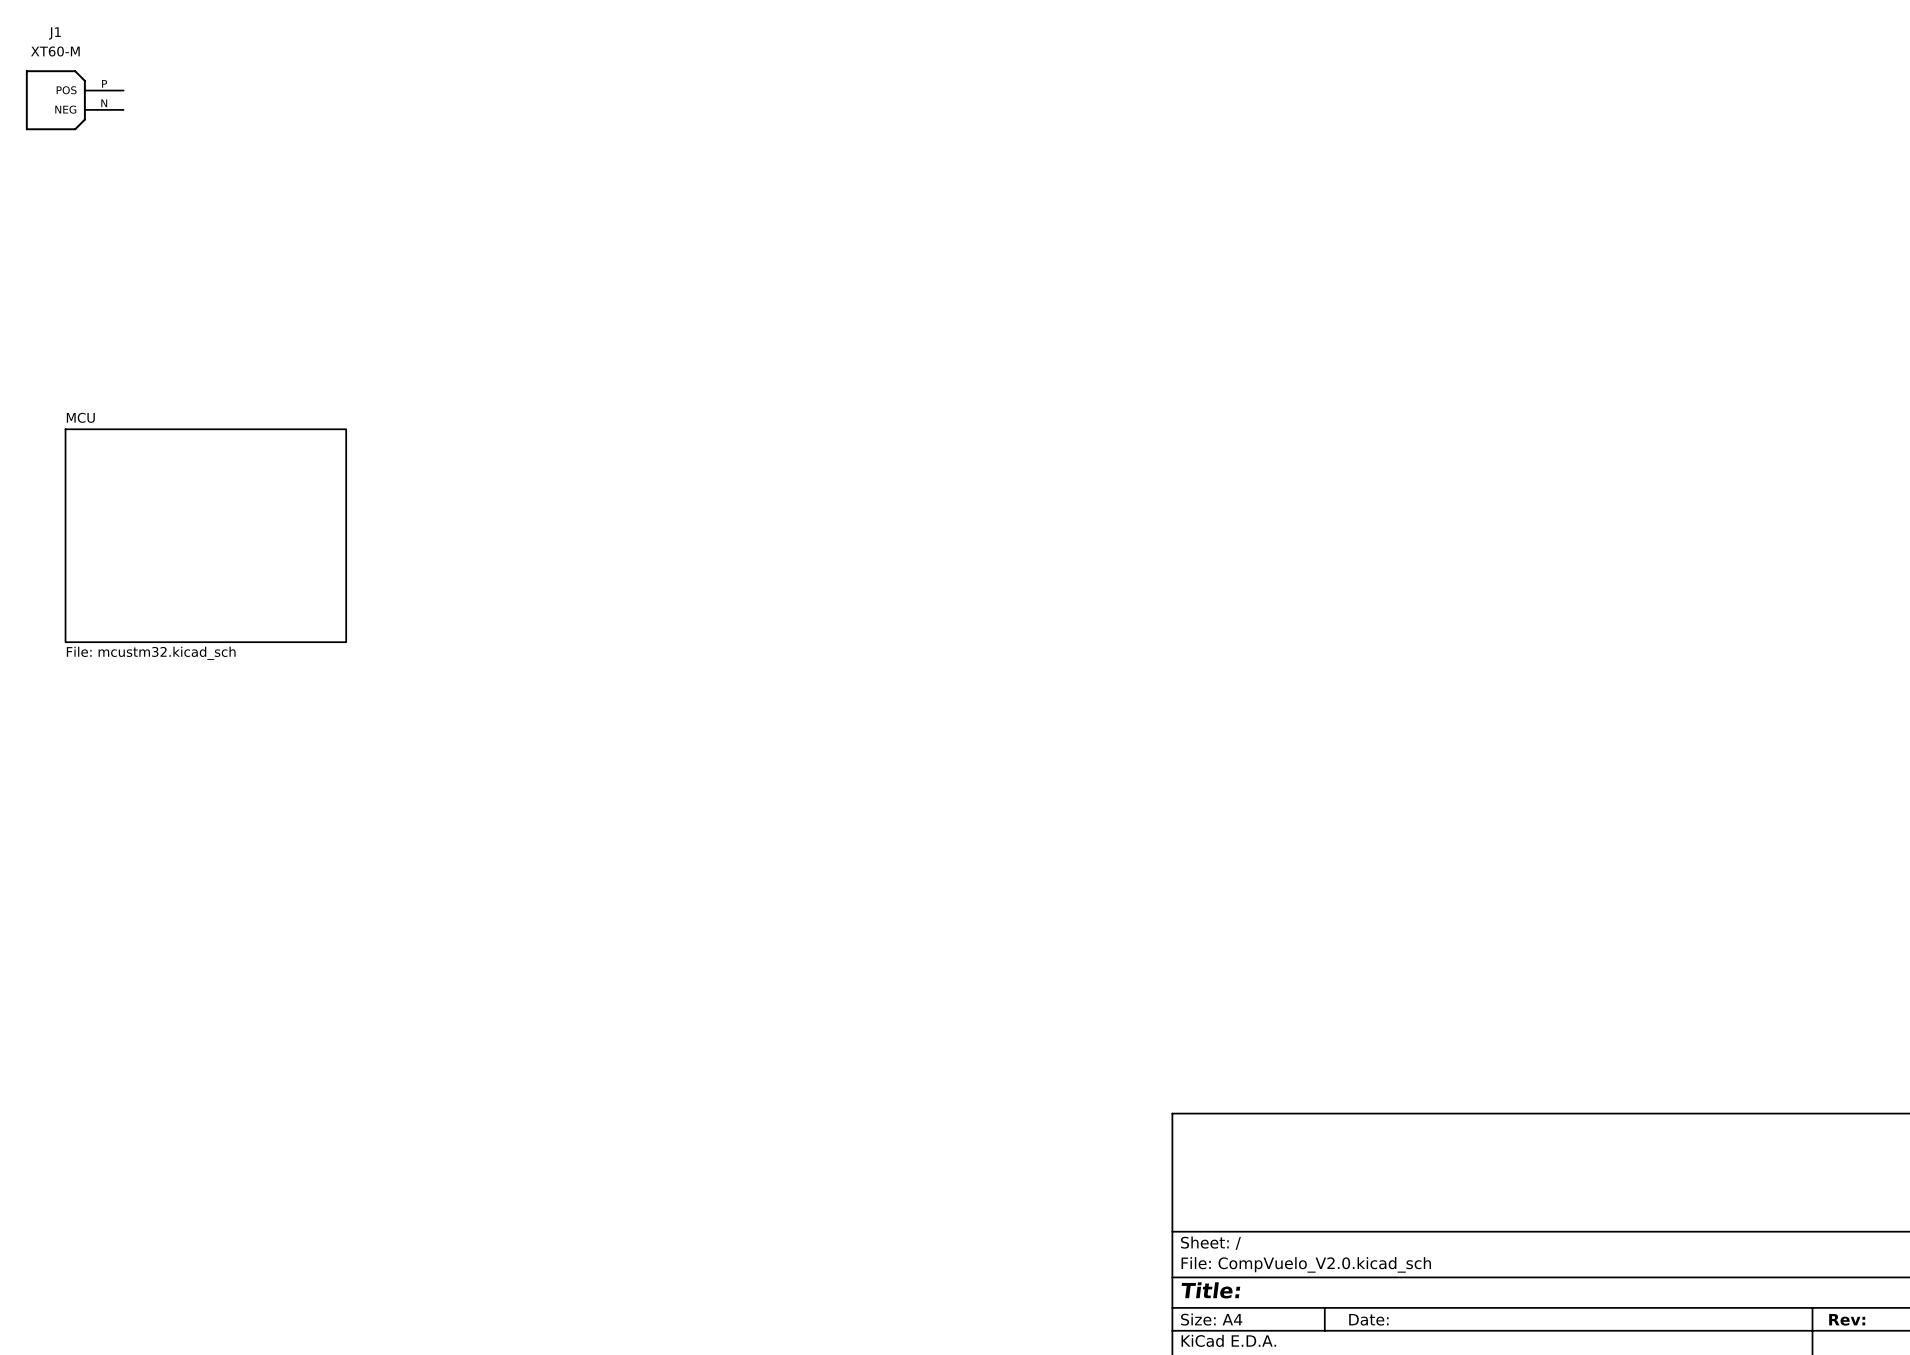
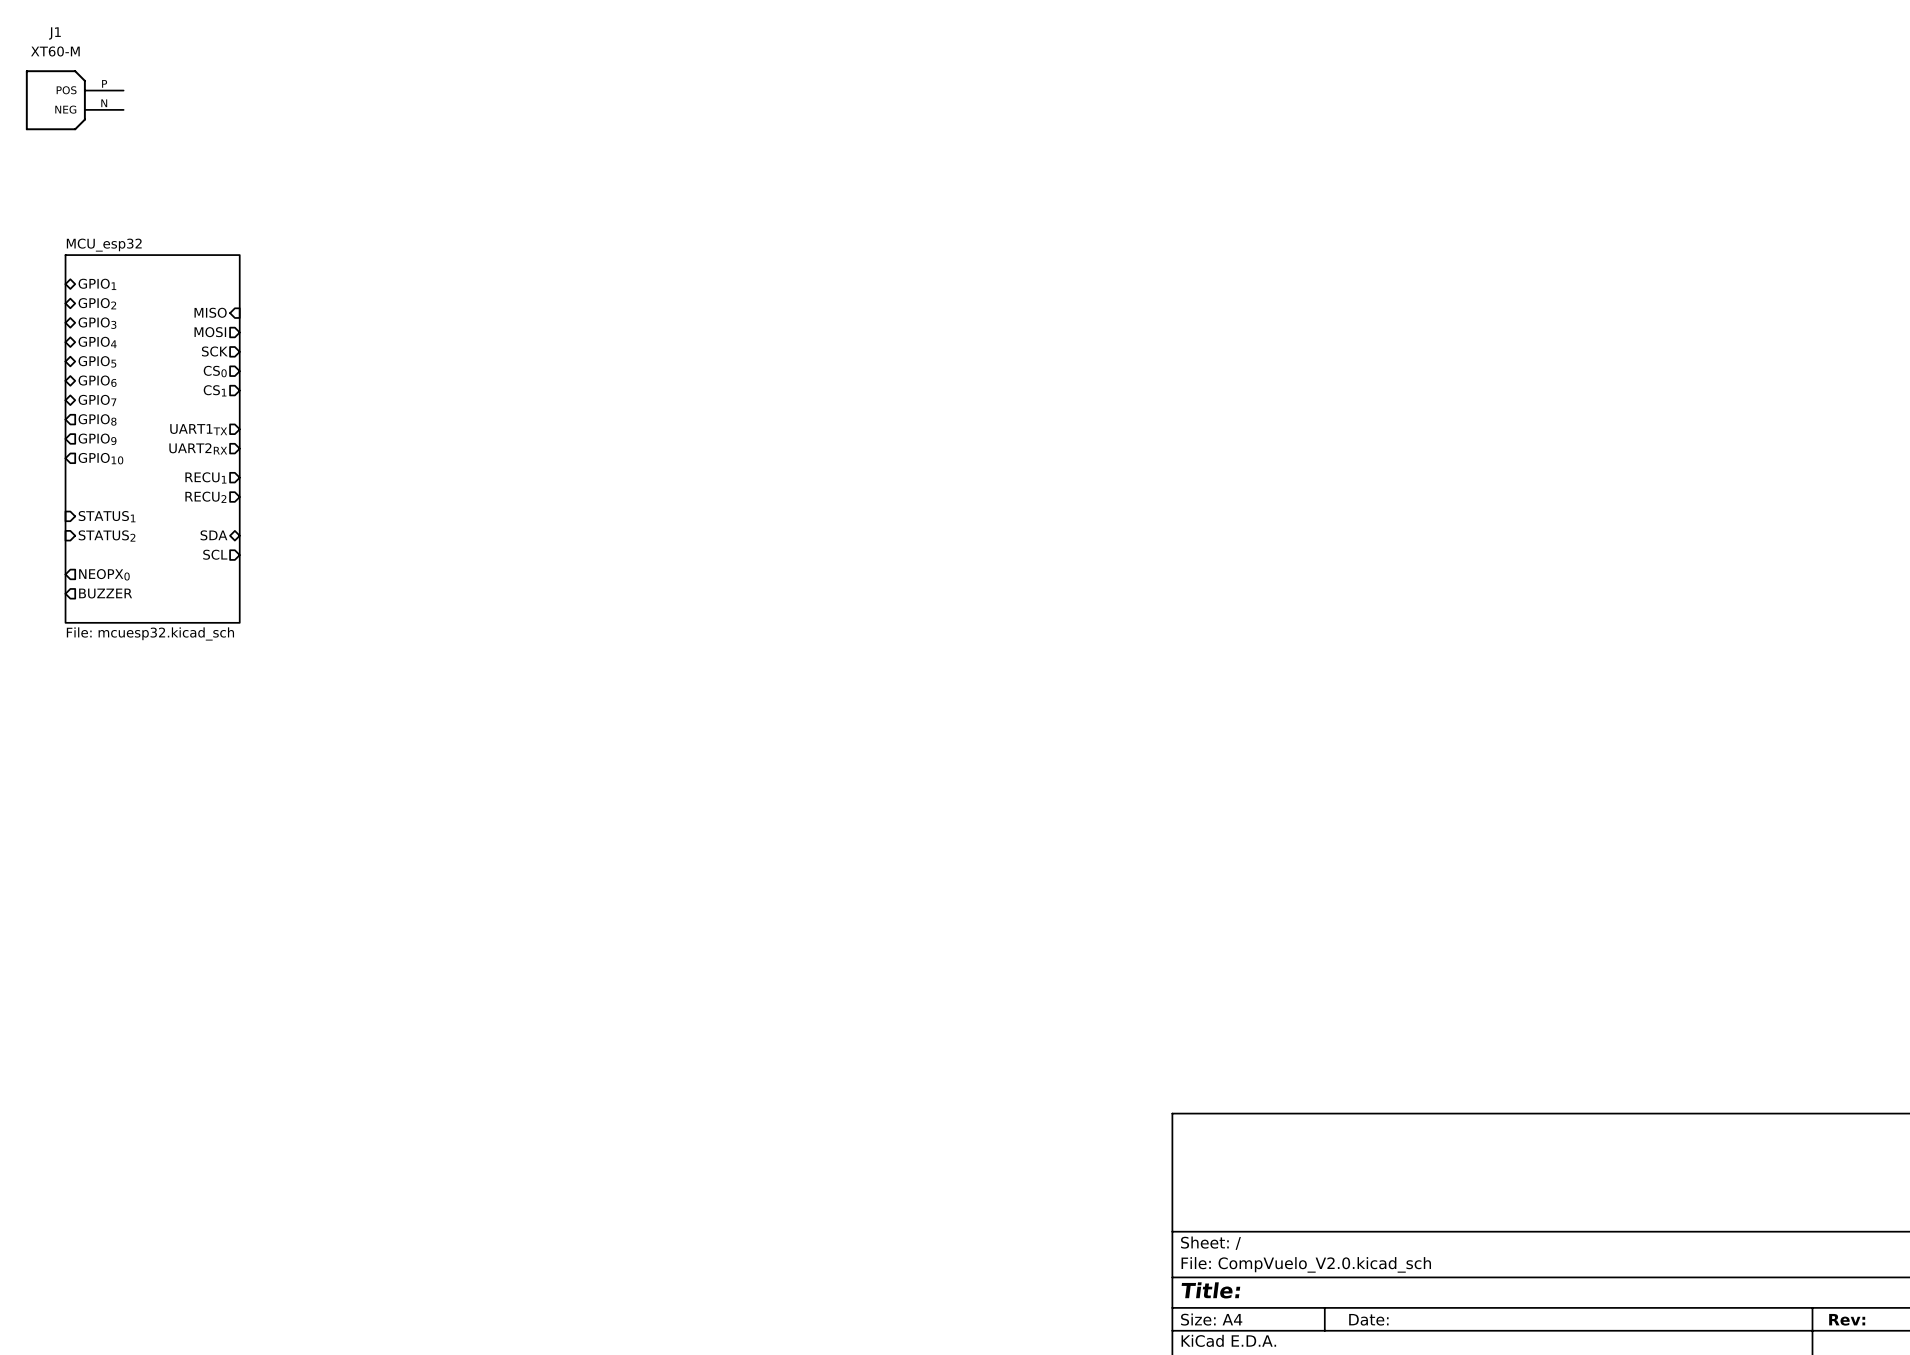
sheet pin: none -> GPIO1 (97, 284)
sheet pin: none -> GPIO2 (97, 303)
sheet pin: none -> MISO (210, 312)
sheet pin: none -> GPIO3 (97, 323)
sheet pin: none -> MOSI (210, 332)
sheet pin: none -> GPIO4 (97, 342)
sheet pin: none -> SCK (214, 351)
sheet pin: none -> GPIO5 (97, 361)
sheet pin: none -> CS0 (215, 371)
sheet pin: none -> GPIO6 (97, 381)
sheet pin: none -> CS1 (215, 390)
sheet pin: none -> GPIO7 (97, 400)
sheet pin: none -> GPIO8 (97, 419)
sheet pin: none -> UART1TX (198, 429)
sheet MCU_esp32: none -> File: mcuesp32.kicad_sch (152, 438)
sheet pin: none -> GPIO9 (97, 439)
sheet pin: none -> UART2RX (198, 448)
sheet pin: none -> GPIO10 (100, 458)
sheet pin: none -> RECU1 (205, 477)
sheet pin: none -> RECU2 (205, 497)
sheet pin: none -> STATUS1 (107, 516)
sheet MCU: File: mcustm32.kicad_sch (205, 535) -> none
sheet pin: none -> SDA (213, 535)
sheet pin: none -> STATUS2 (107, 536)
sheet pin: none -> SCL (215, 554)
sheet pin: none -> NEOPX0 (104, 574)
sheet pin: none -> BUZZER (105, 593)

